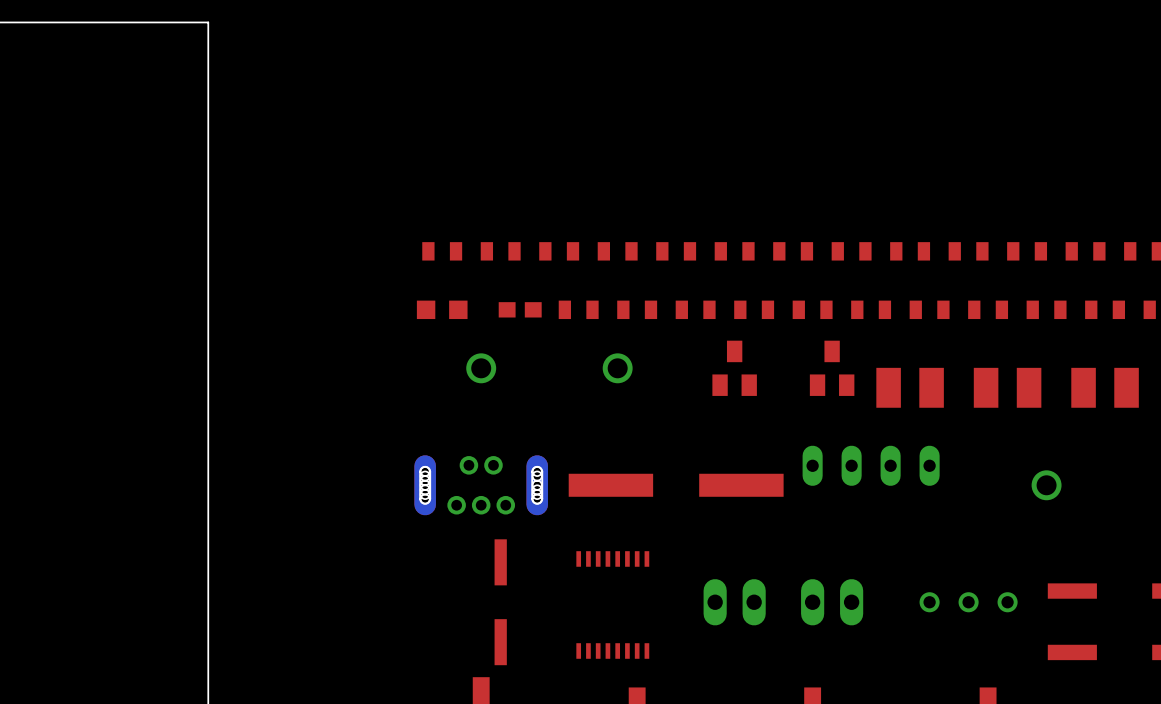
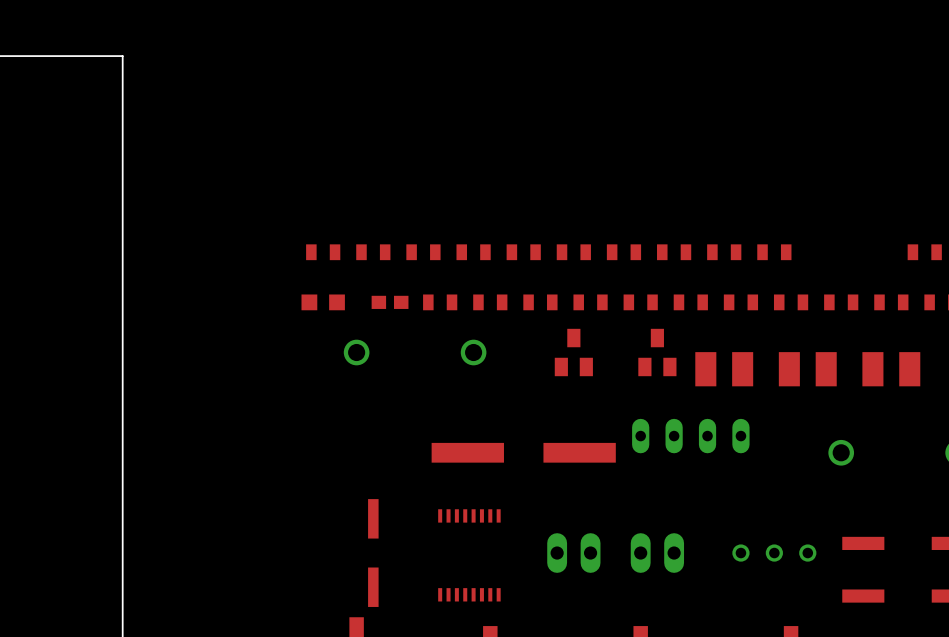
part: (1027, 251) -> none
part: (1085, 251) -> none
part: (481, 485) -> none

